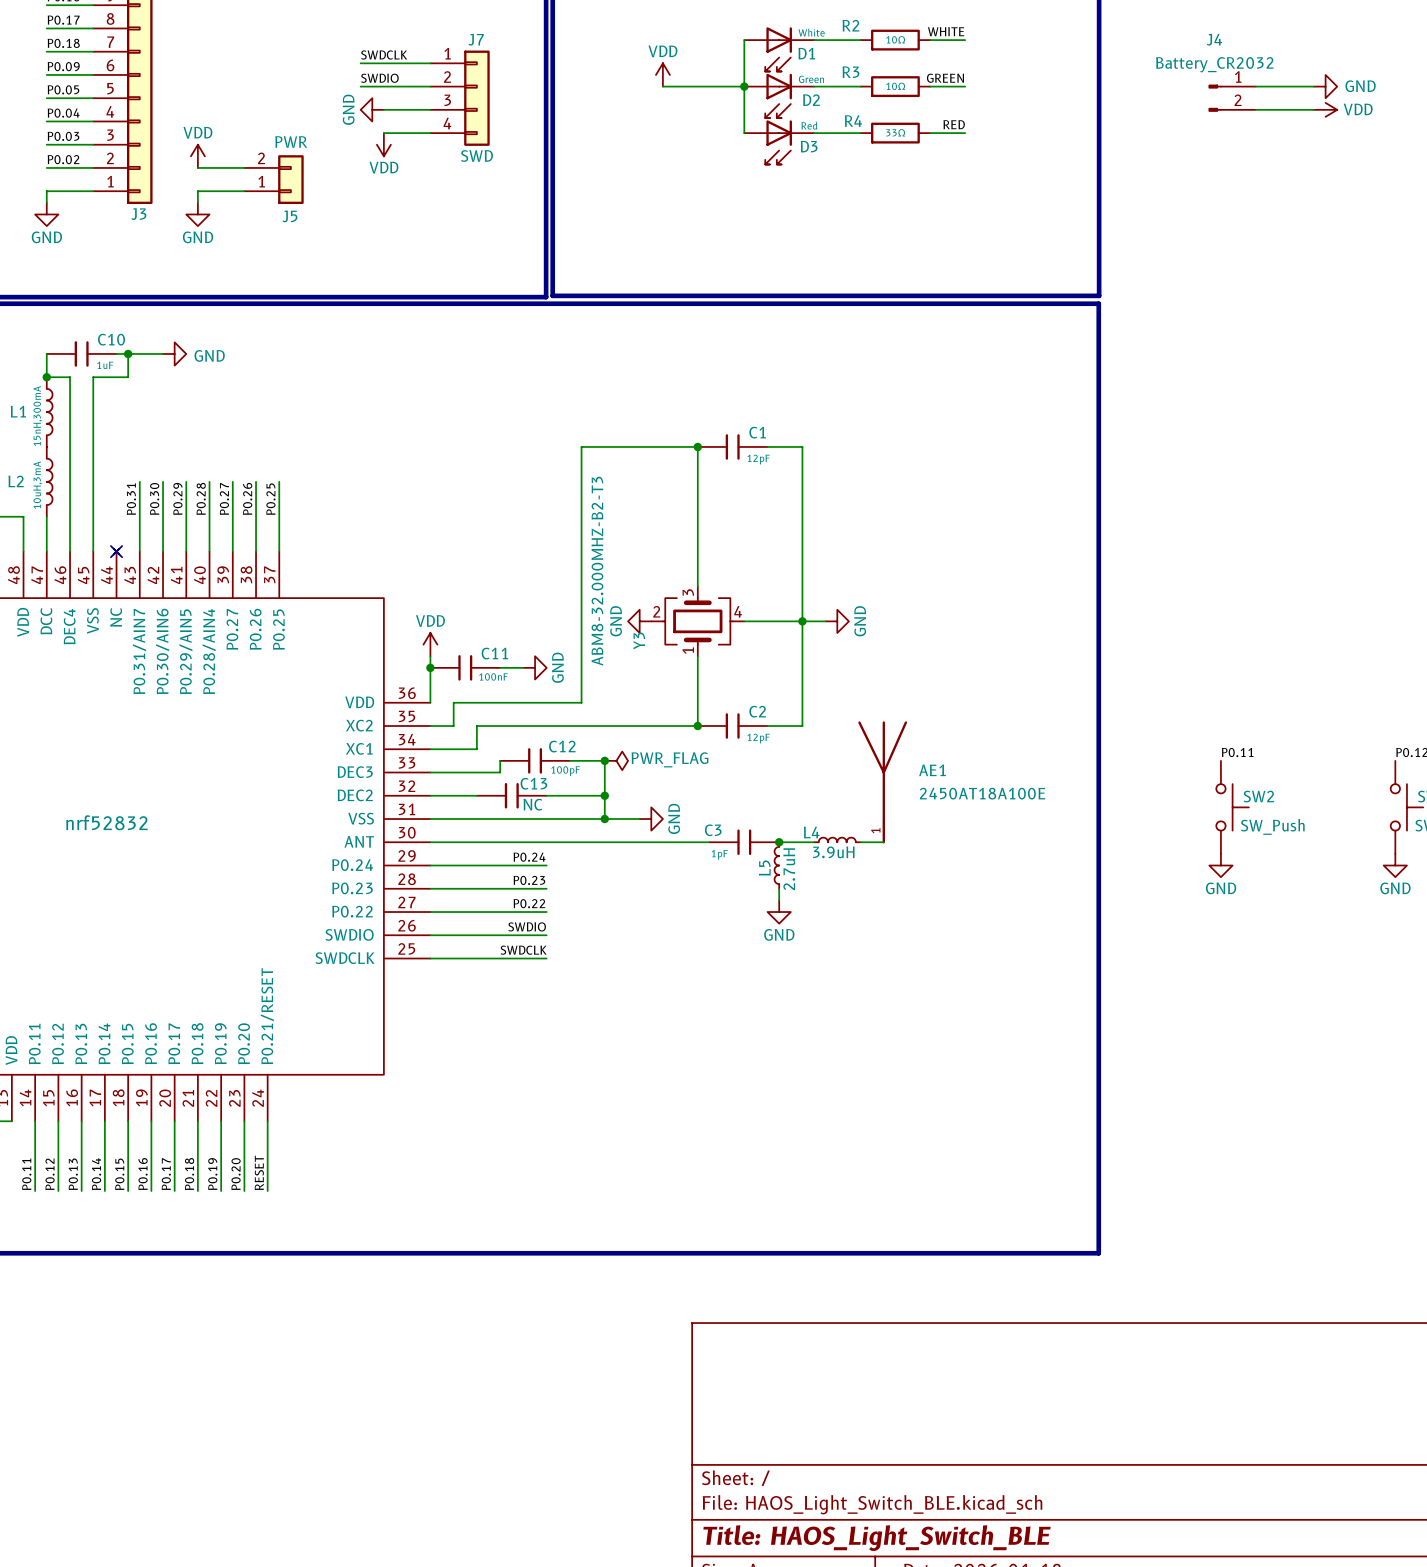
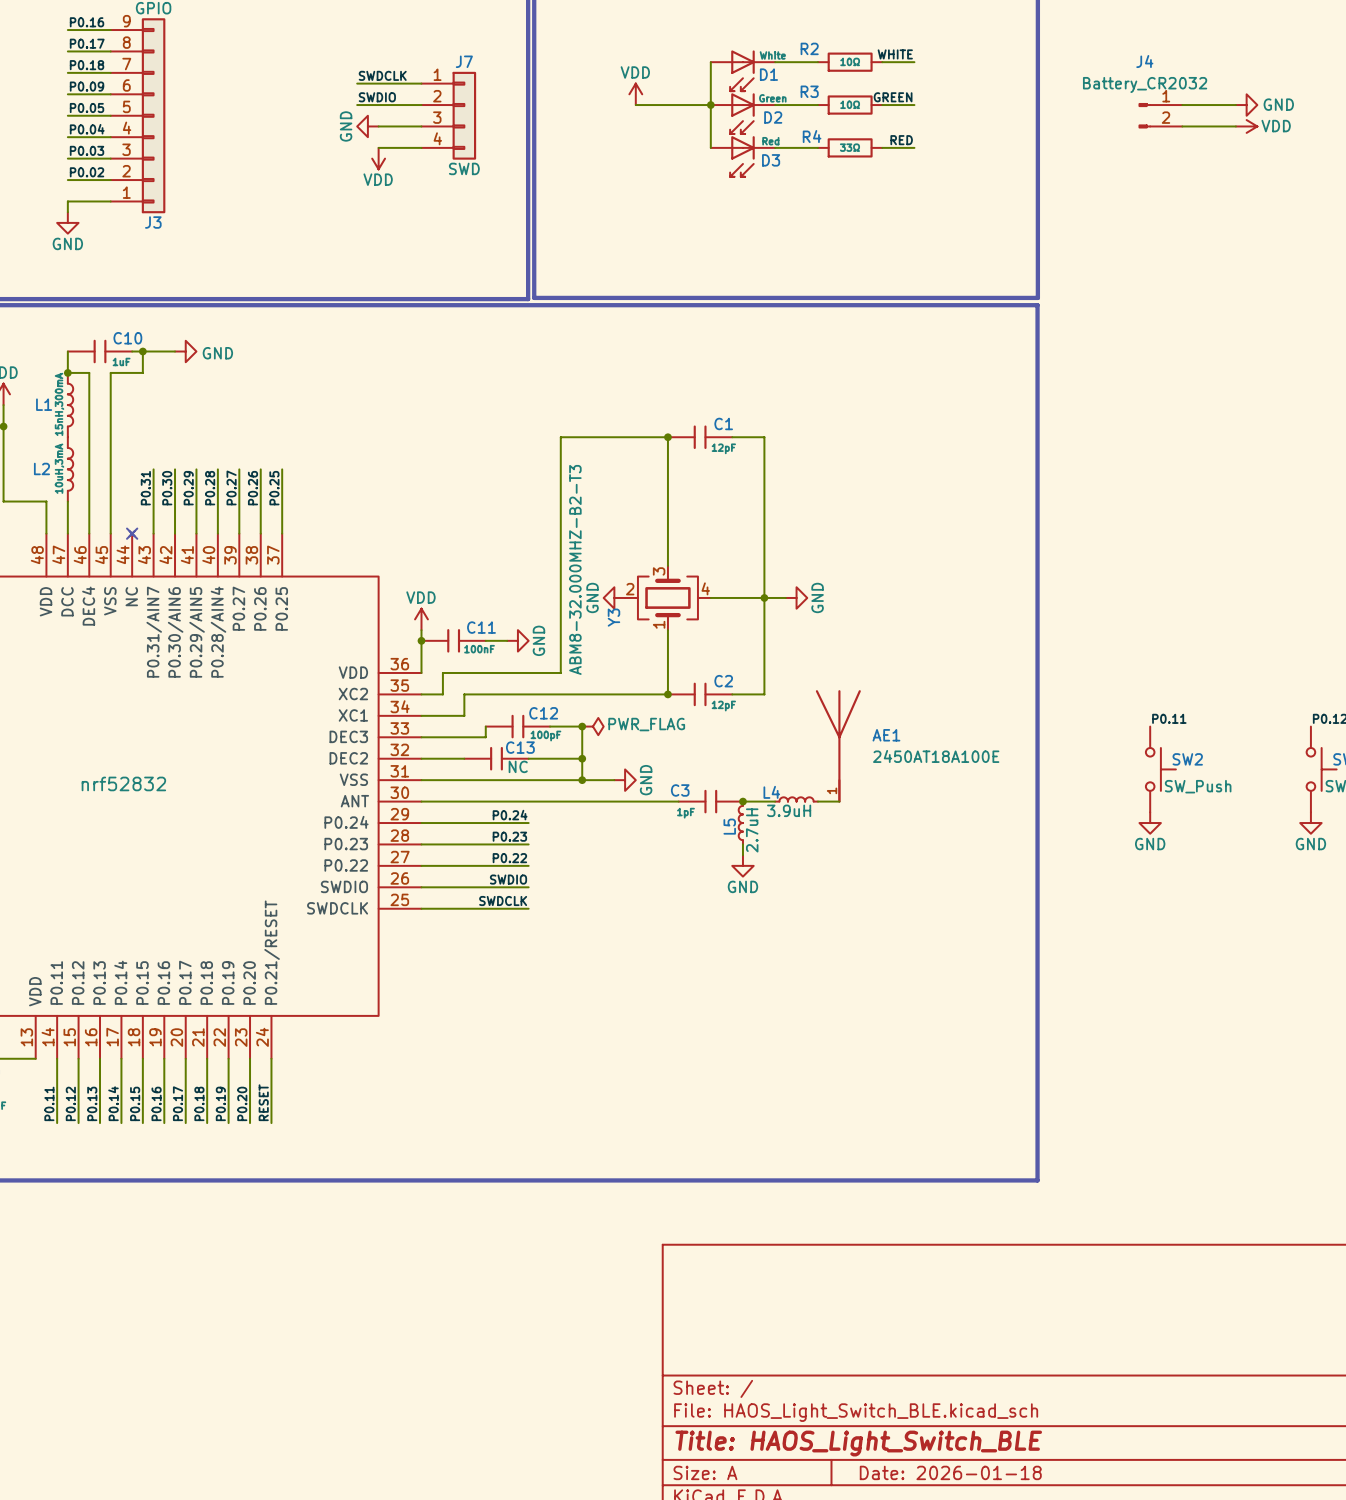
power symbol: VDD (197, 156) -> none
wire: (197, 167) (244, 167) -> none
J5: PWR (274, 179) -> none
wire: (244, 191) (197, 191) (197, 202) -> none
power symbol: GND (197, 214) -> none

